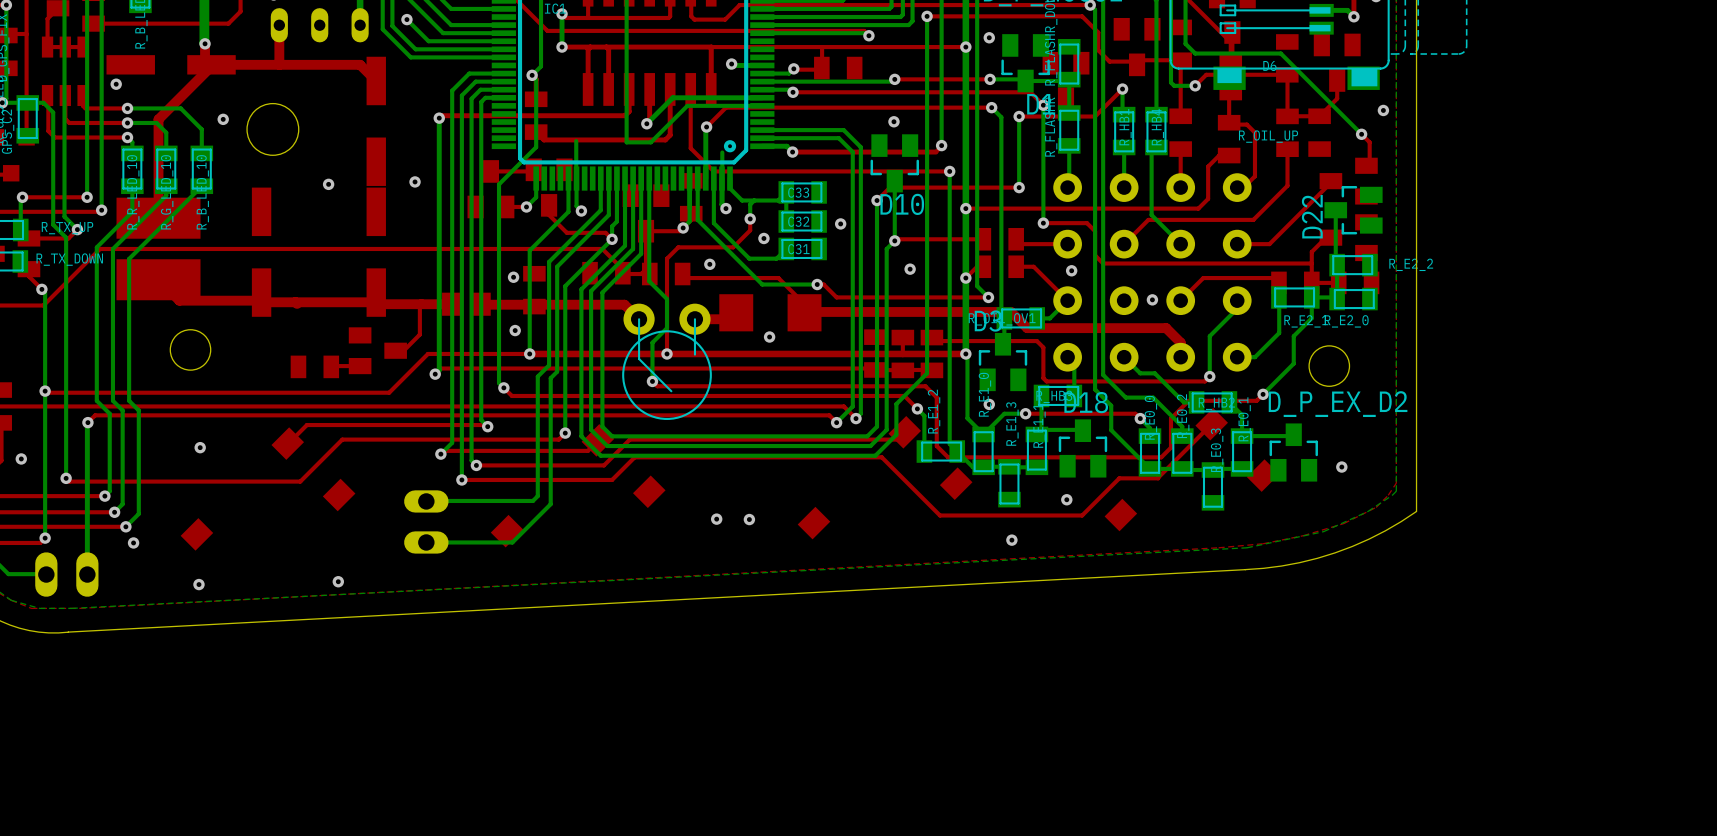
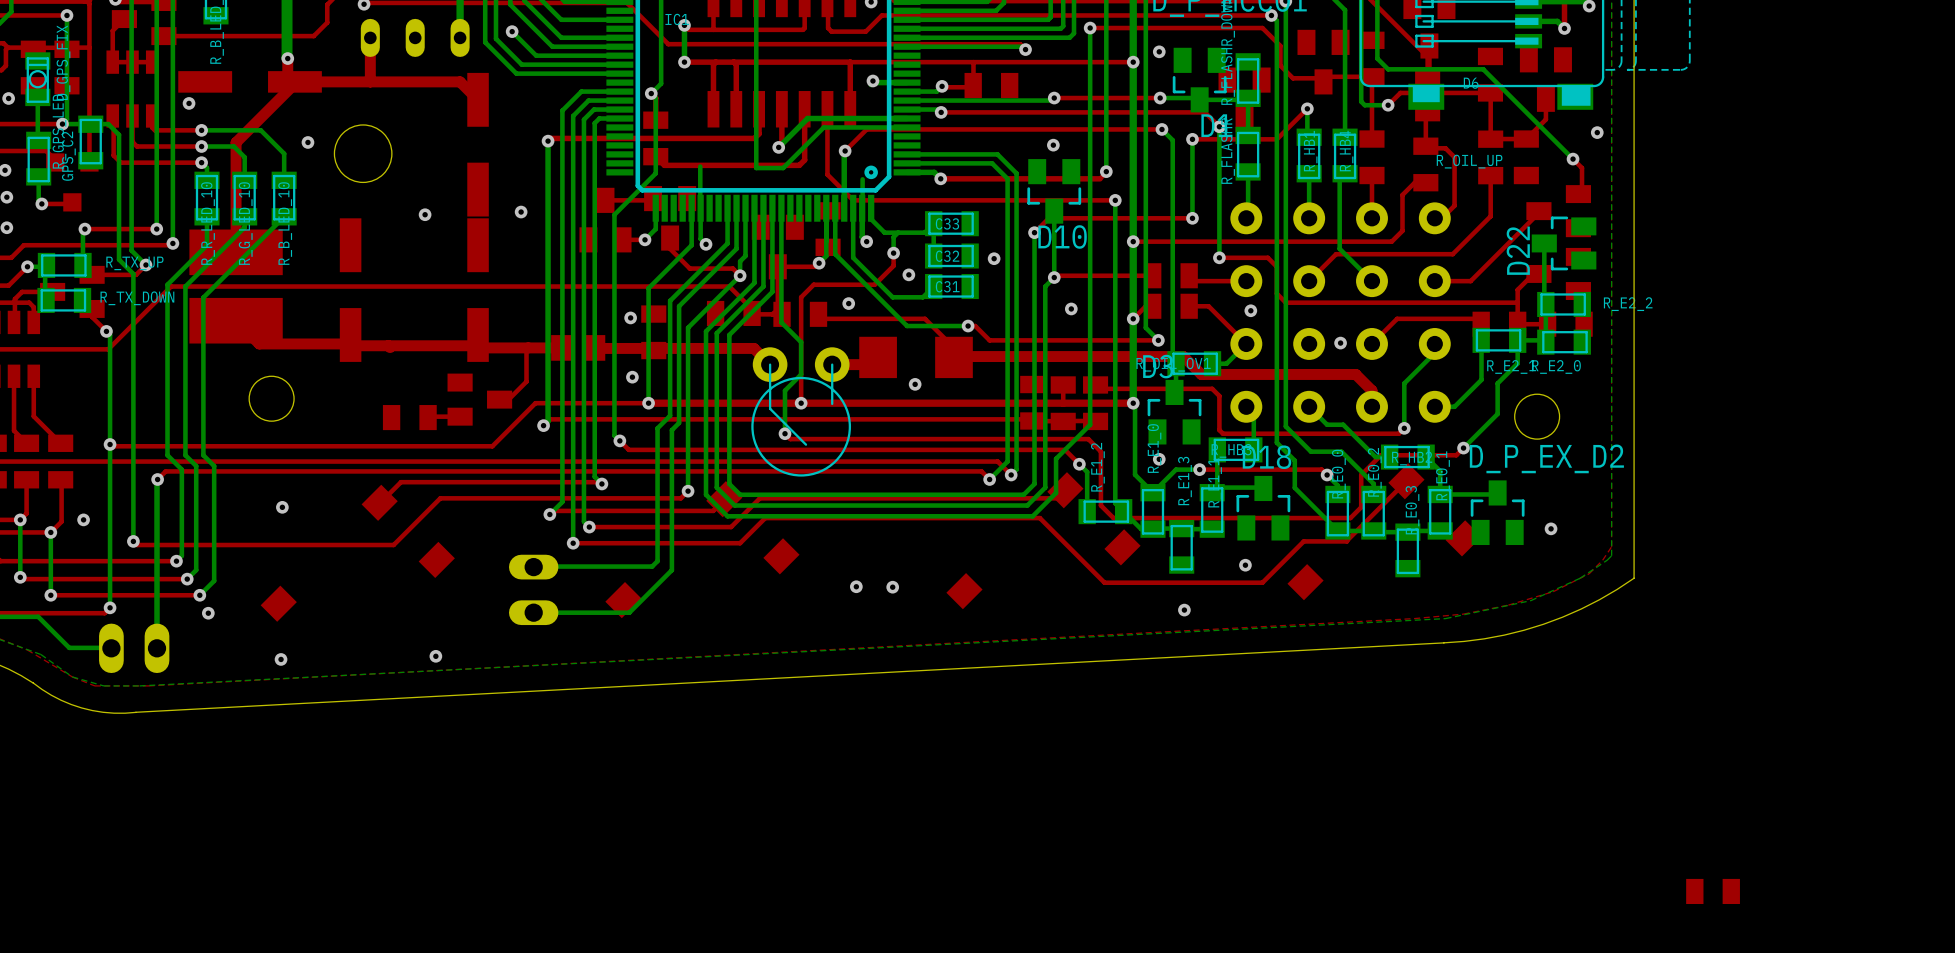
part: none -> (1713, 891)

